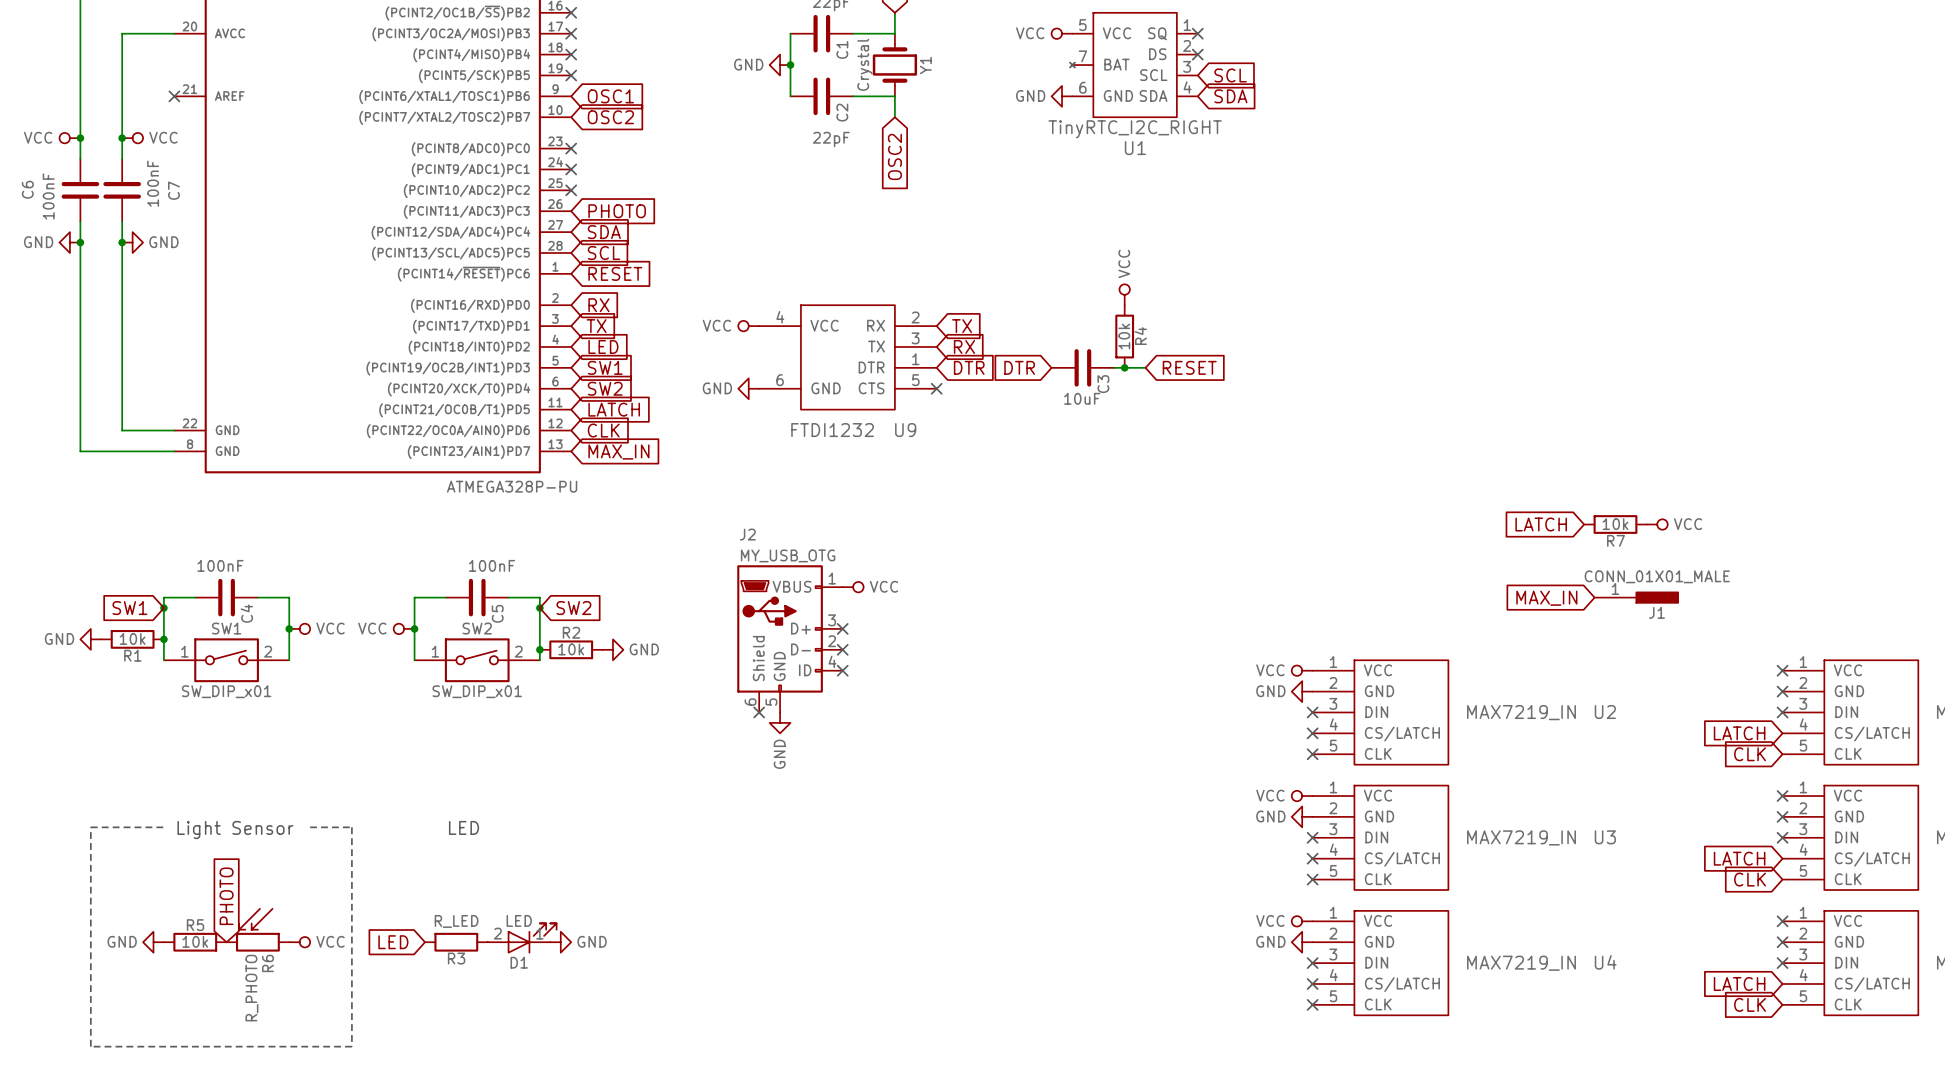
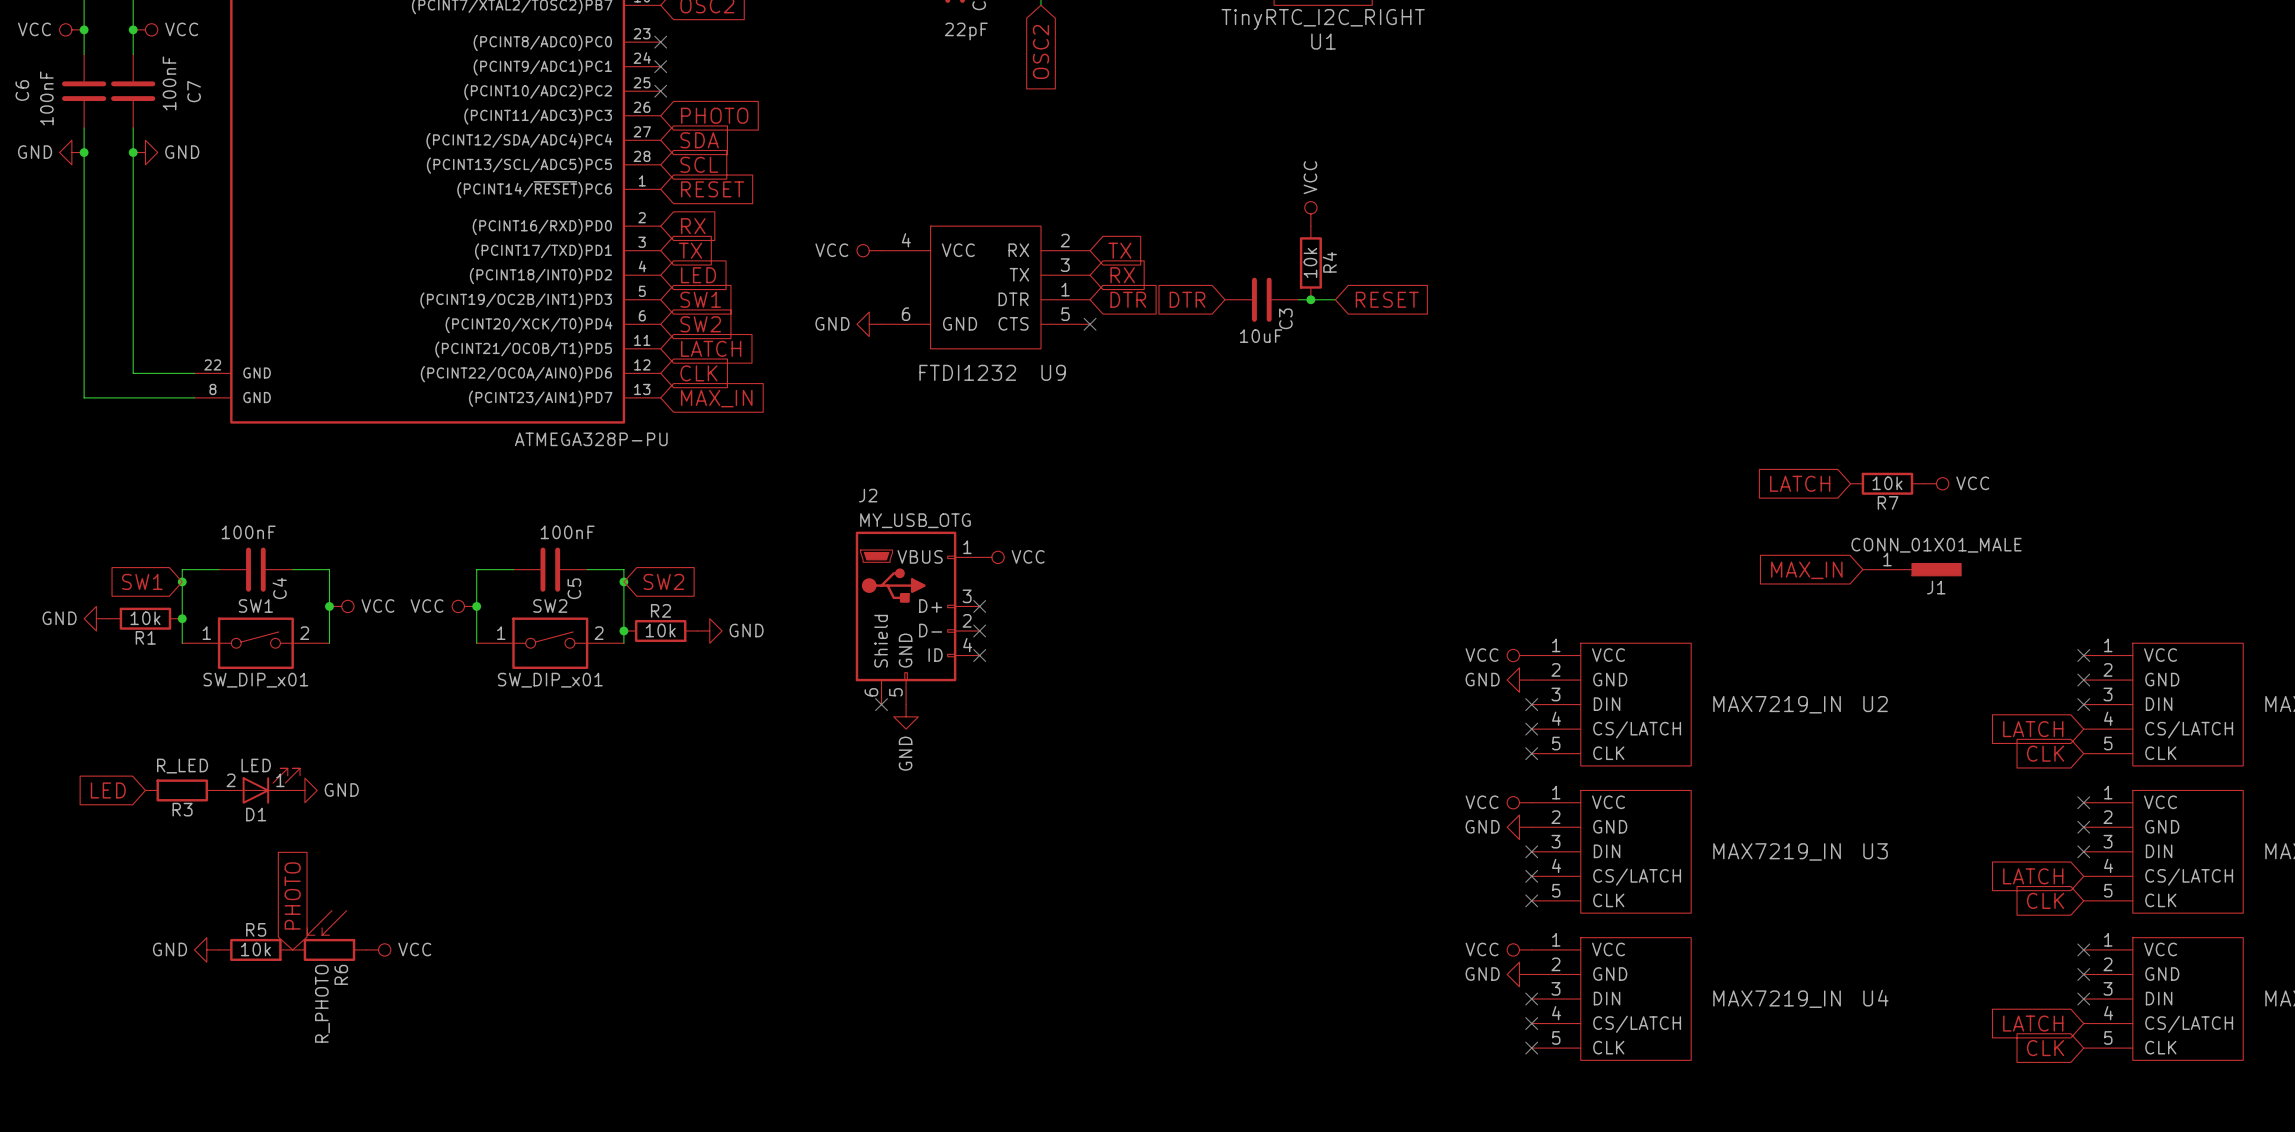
global label: none -> LED (108, 790)
power symbol: none -> GND (304, 790)
line: (163, 827) (90, 827) (90, 1046) (351, 1046) (351, 827) (310, 827) -> none
text: LED (464, 827) -> none
text: Light Sensor (235, 830) -> none
global label position: PHOTO (226, 896) -> PHOTO (292, 895)
R6 position: (257, 930) -> (329, 935)
D1 position: (522, 938) -> (259, 786)
power symbol position: GND (153, 942) -> GND (206, 949)
R5 position: (195, 942) -> (255, 949)
power symbol position: VCC (299, 942) -> VCC (378, 949)
global label: LED (393, 942) -> none
R3 position: (456, 942) -> (182, 790)
power symbol: GND (560, 942) -> none

